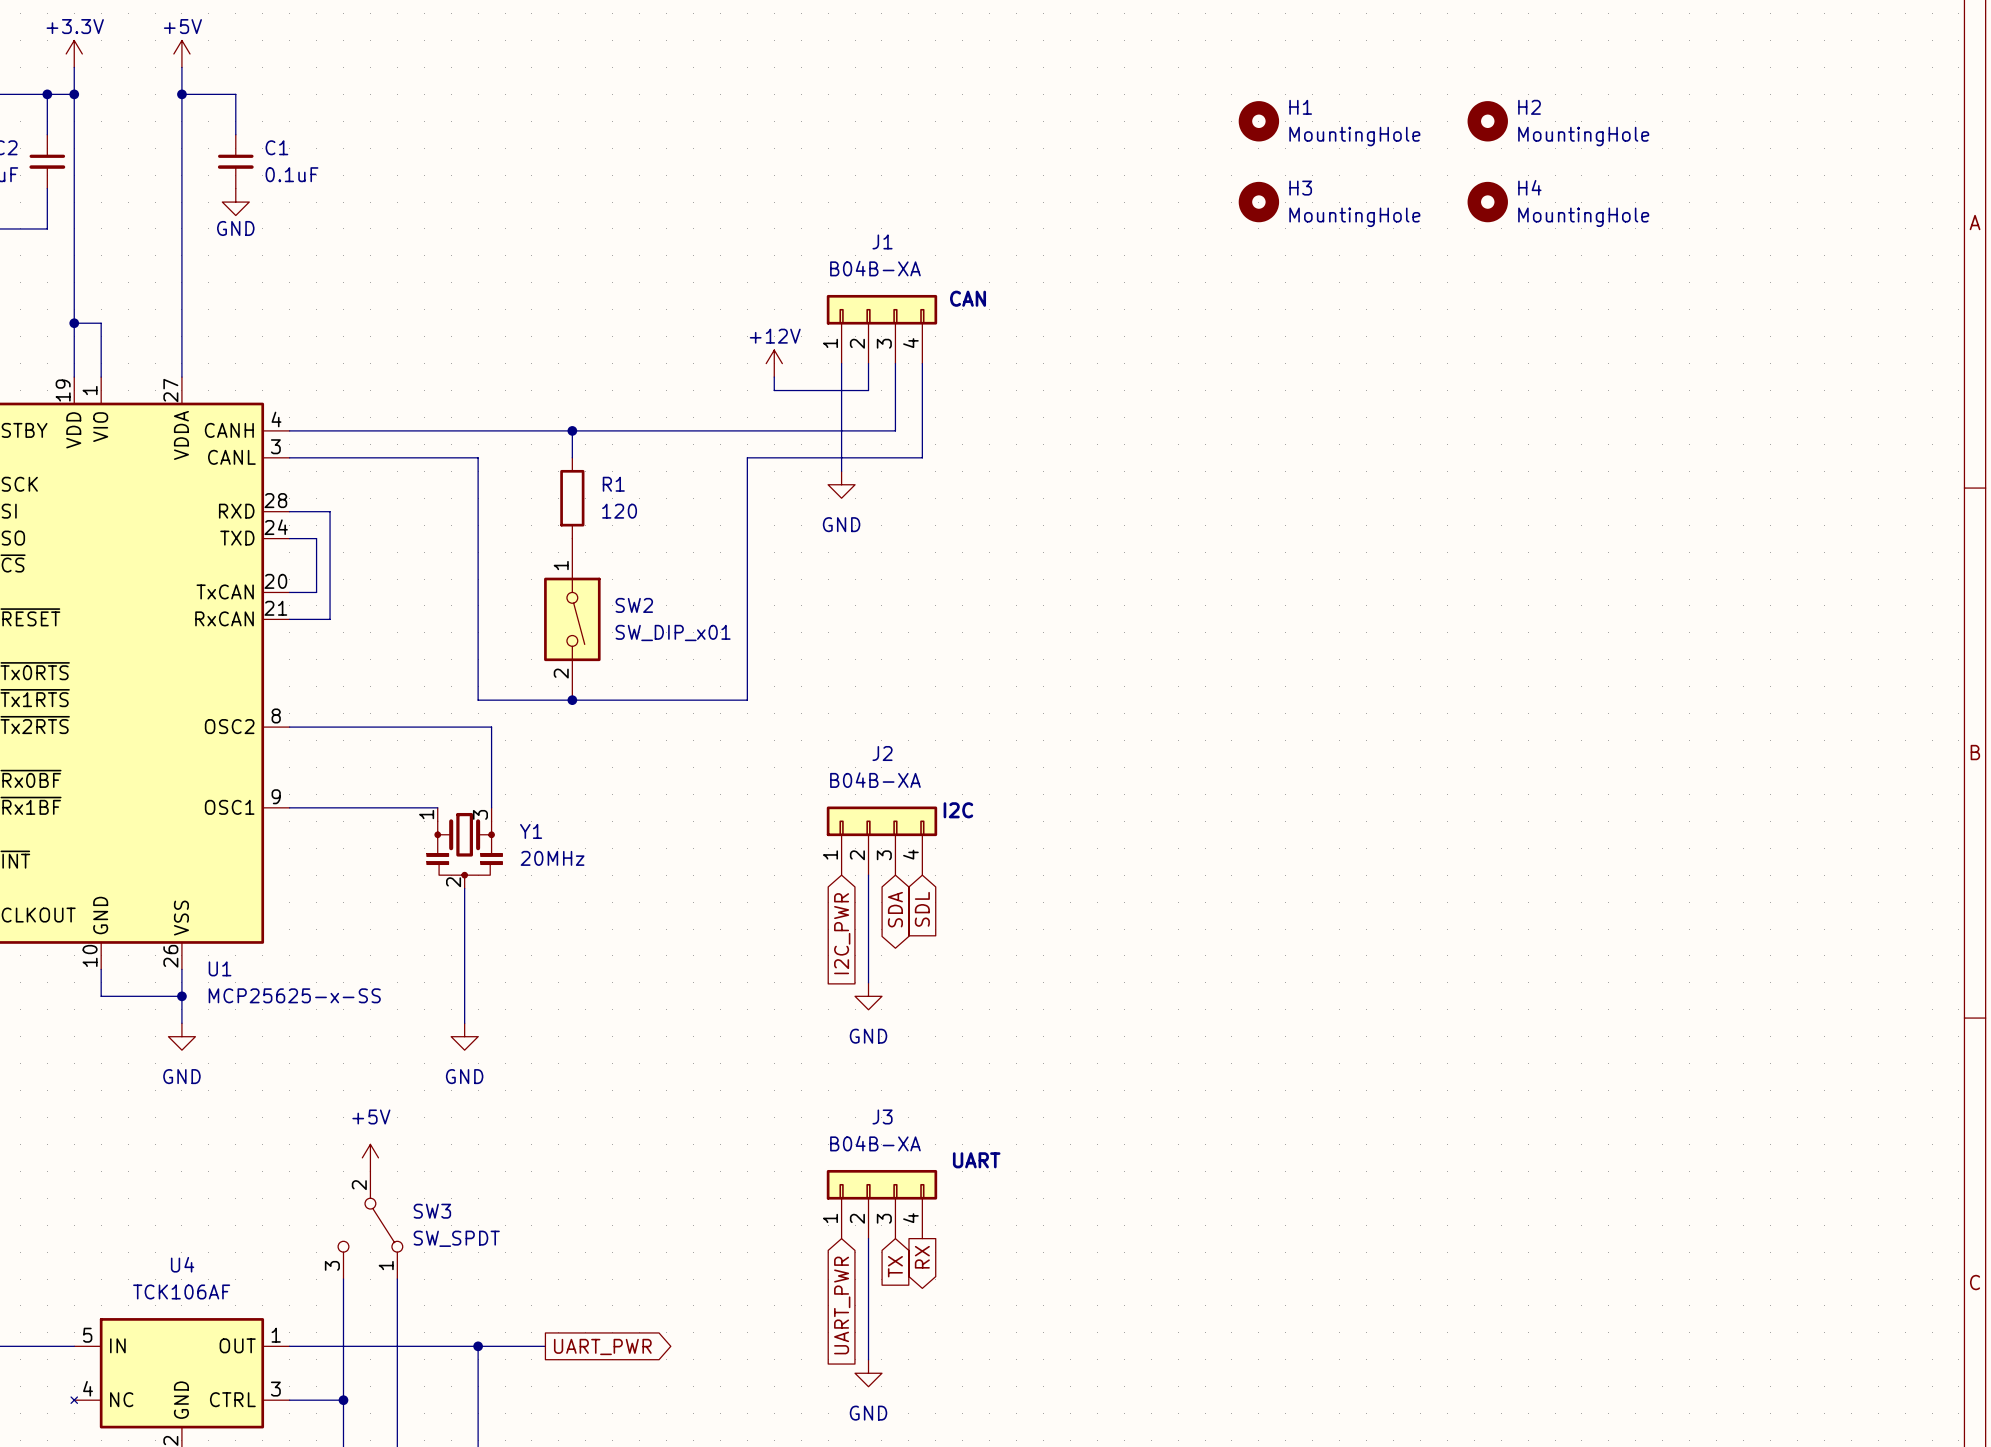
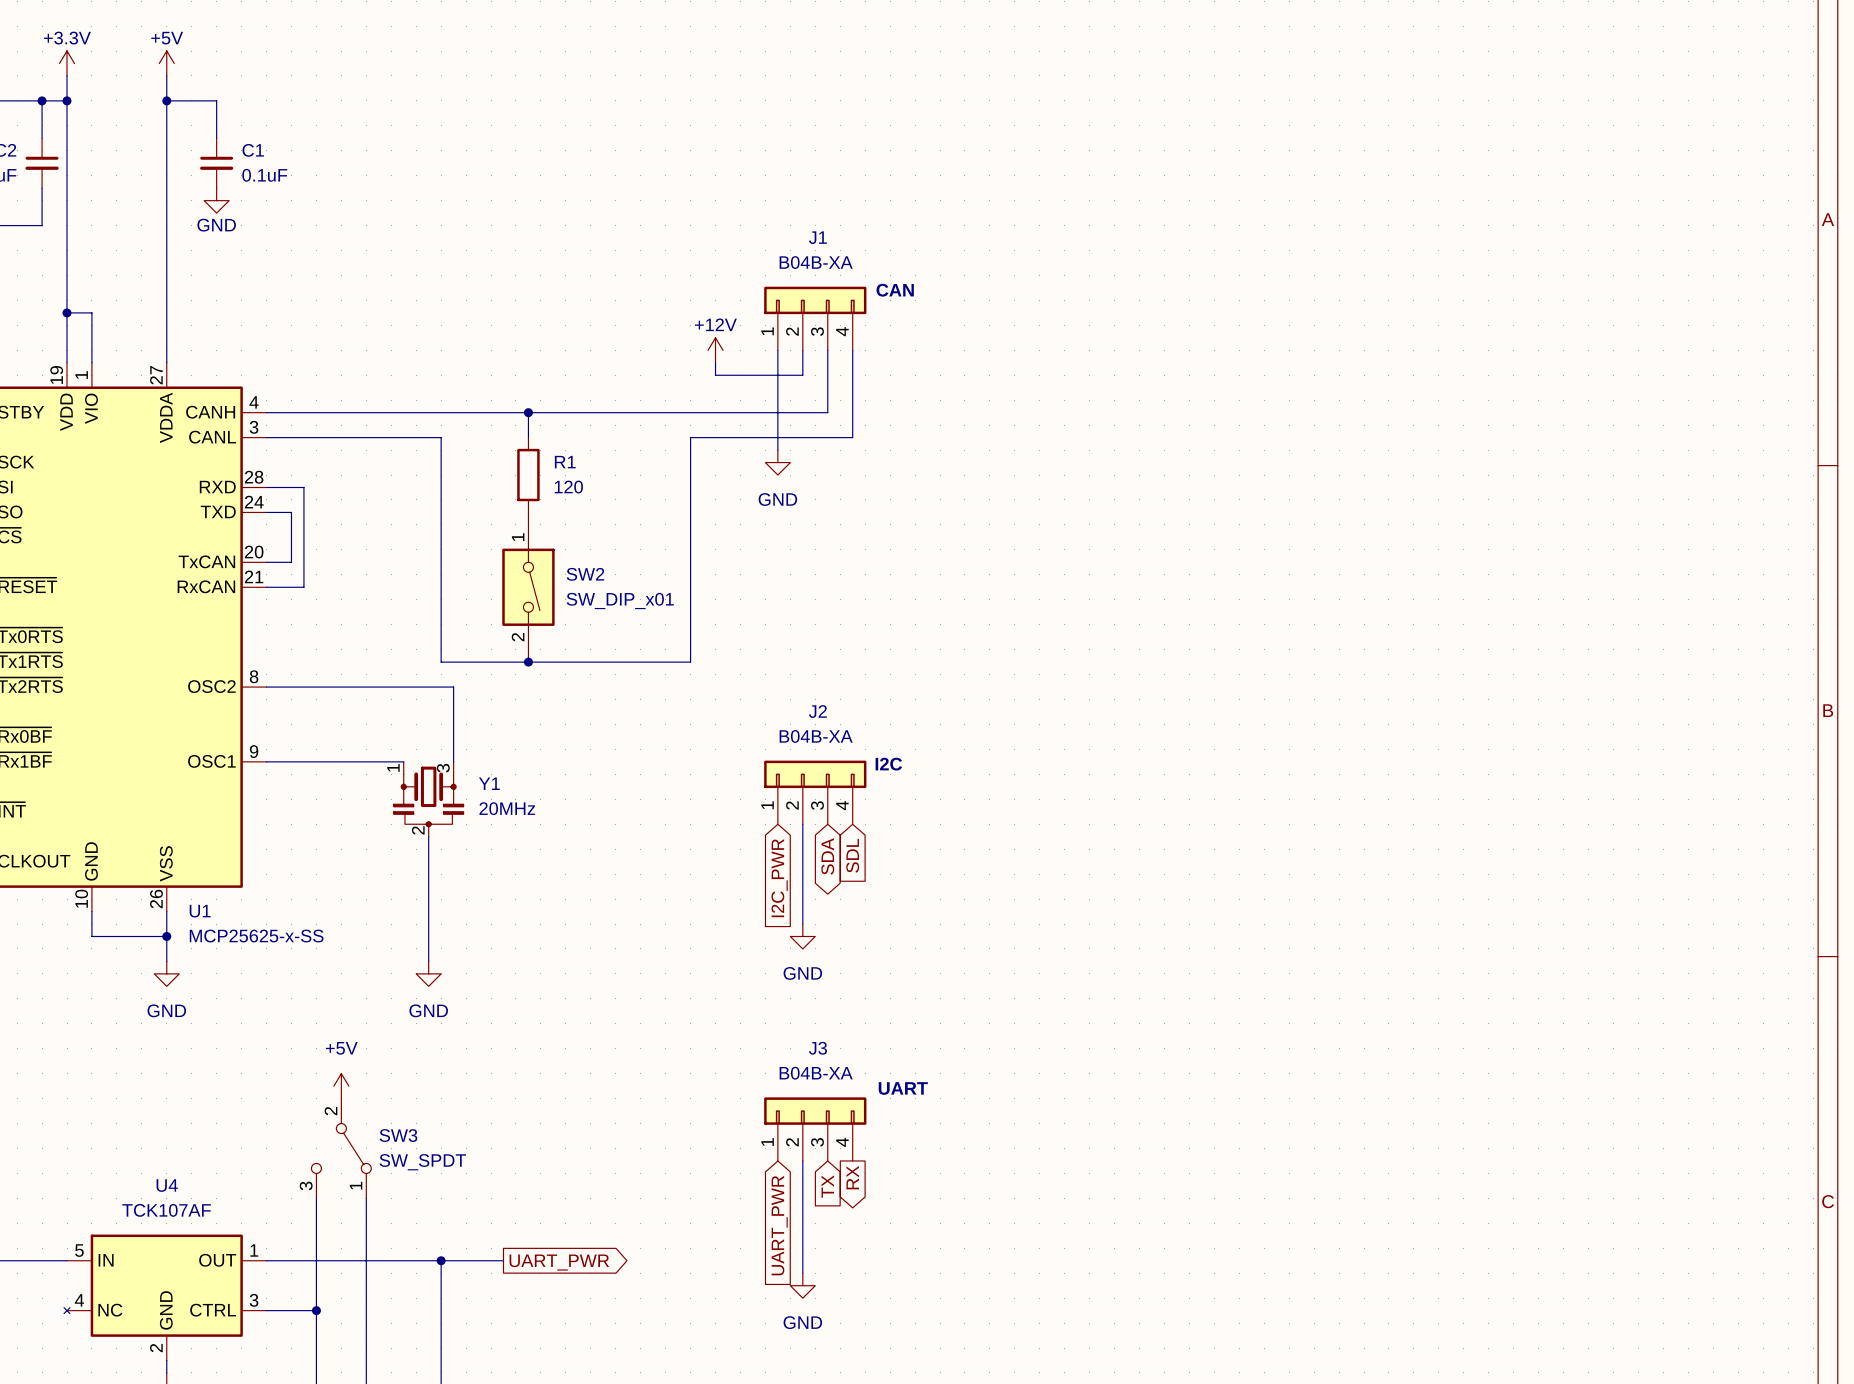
H1: MountingHole (1258, 121) -> none
H2: MountingHole (1487, 121) -> none
H3: MountingHole (1258, 202) -> none
H4: MountingHole (1487, 202) -> none
U4 value: TCK106AF (181, 1291) -> TCK107AF (166, 1210)

